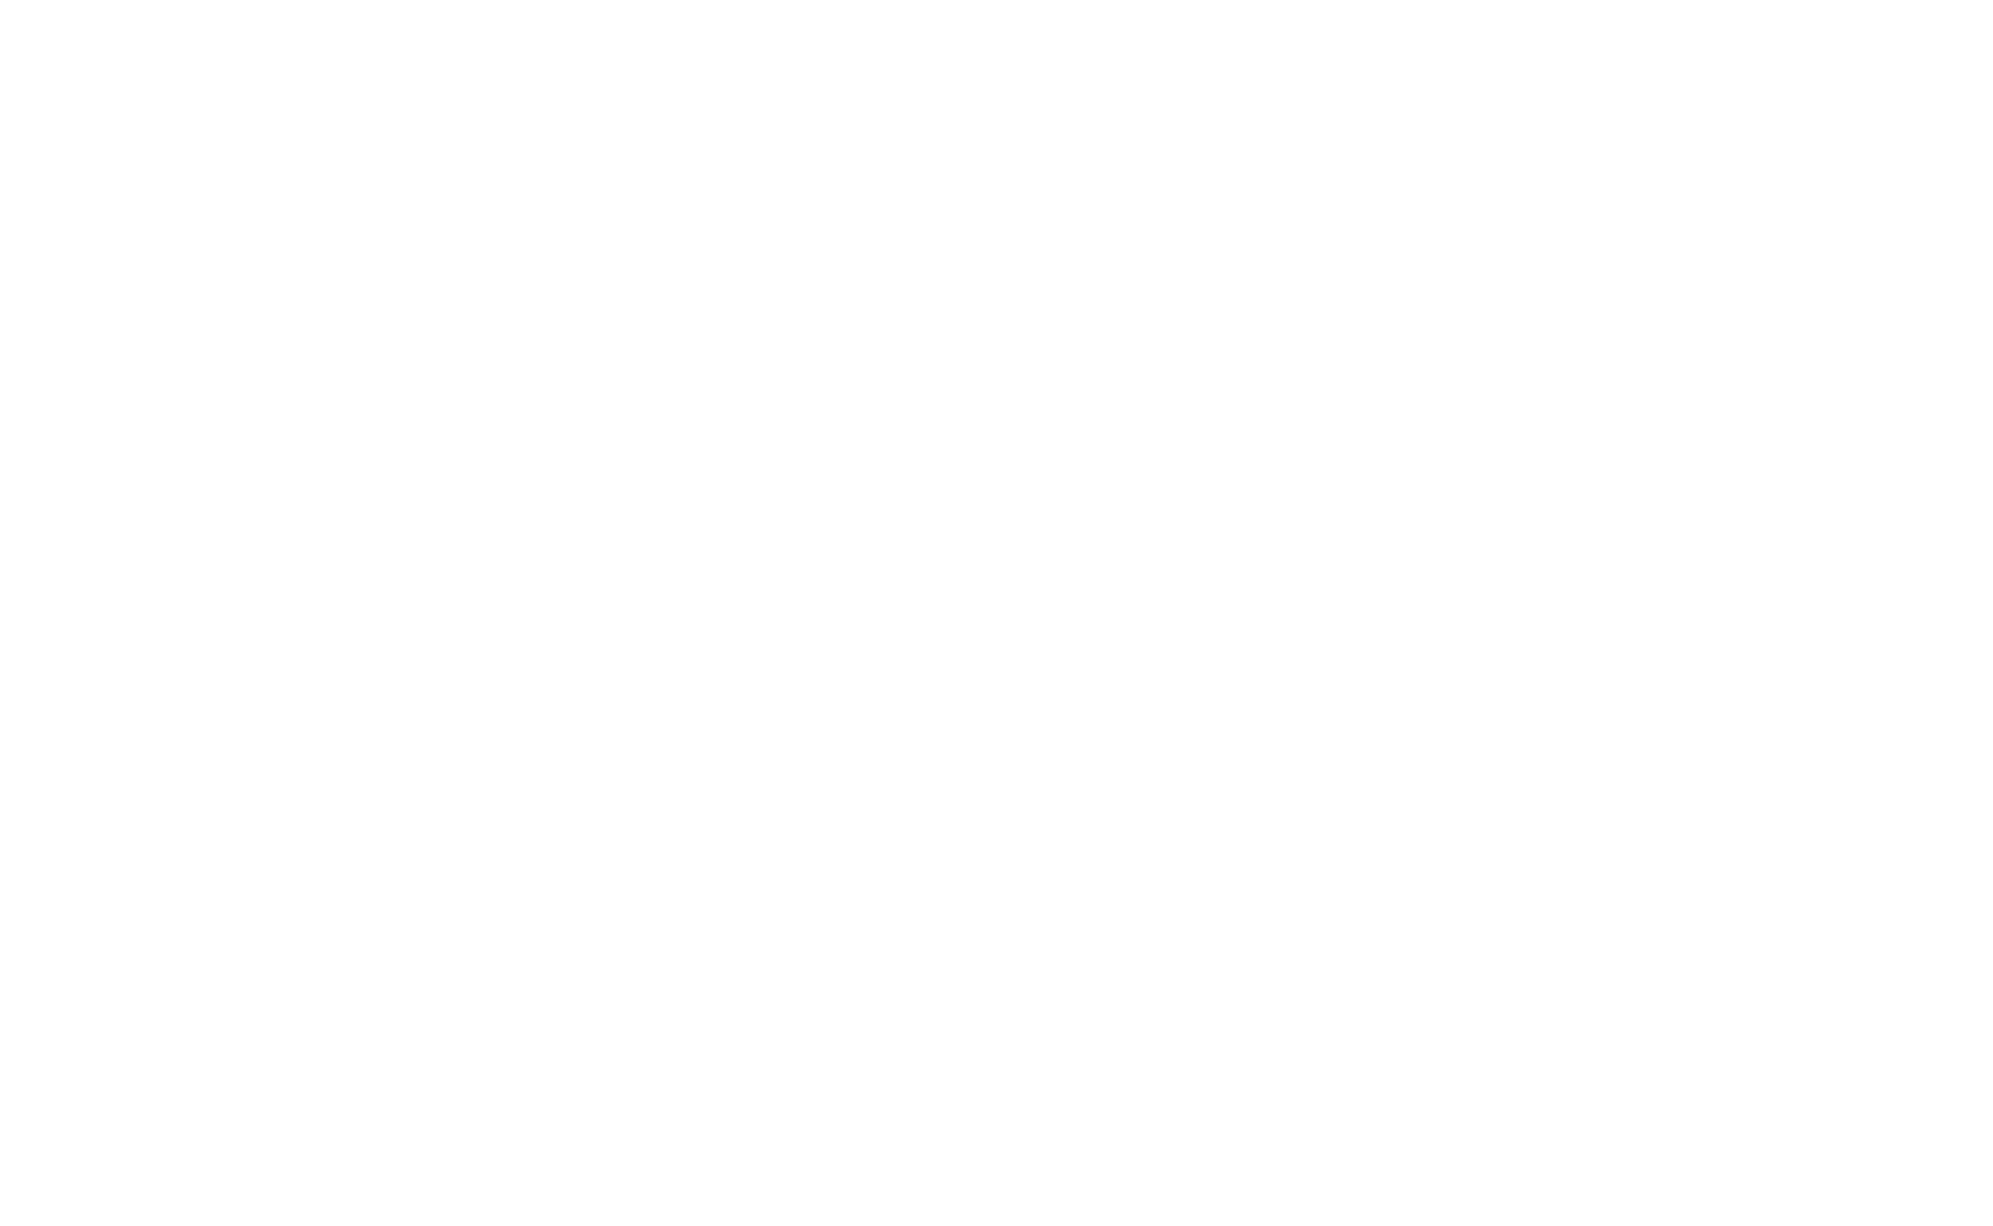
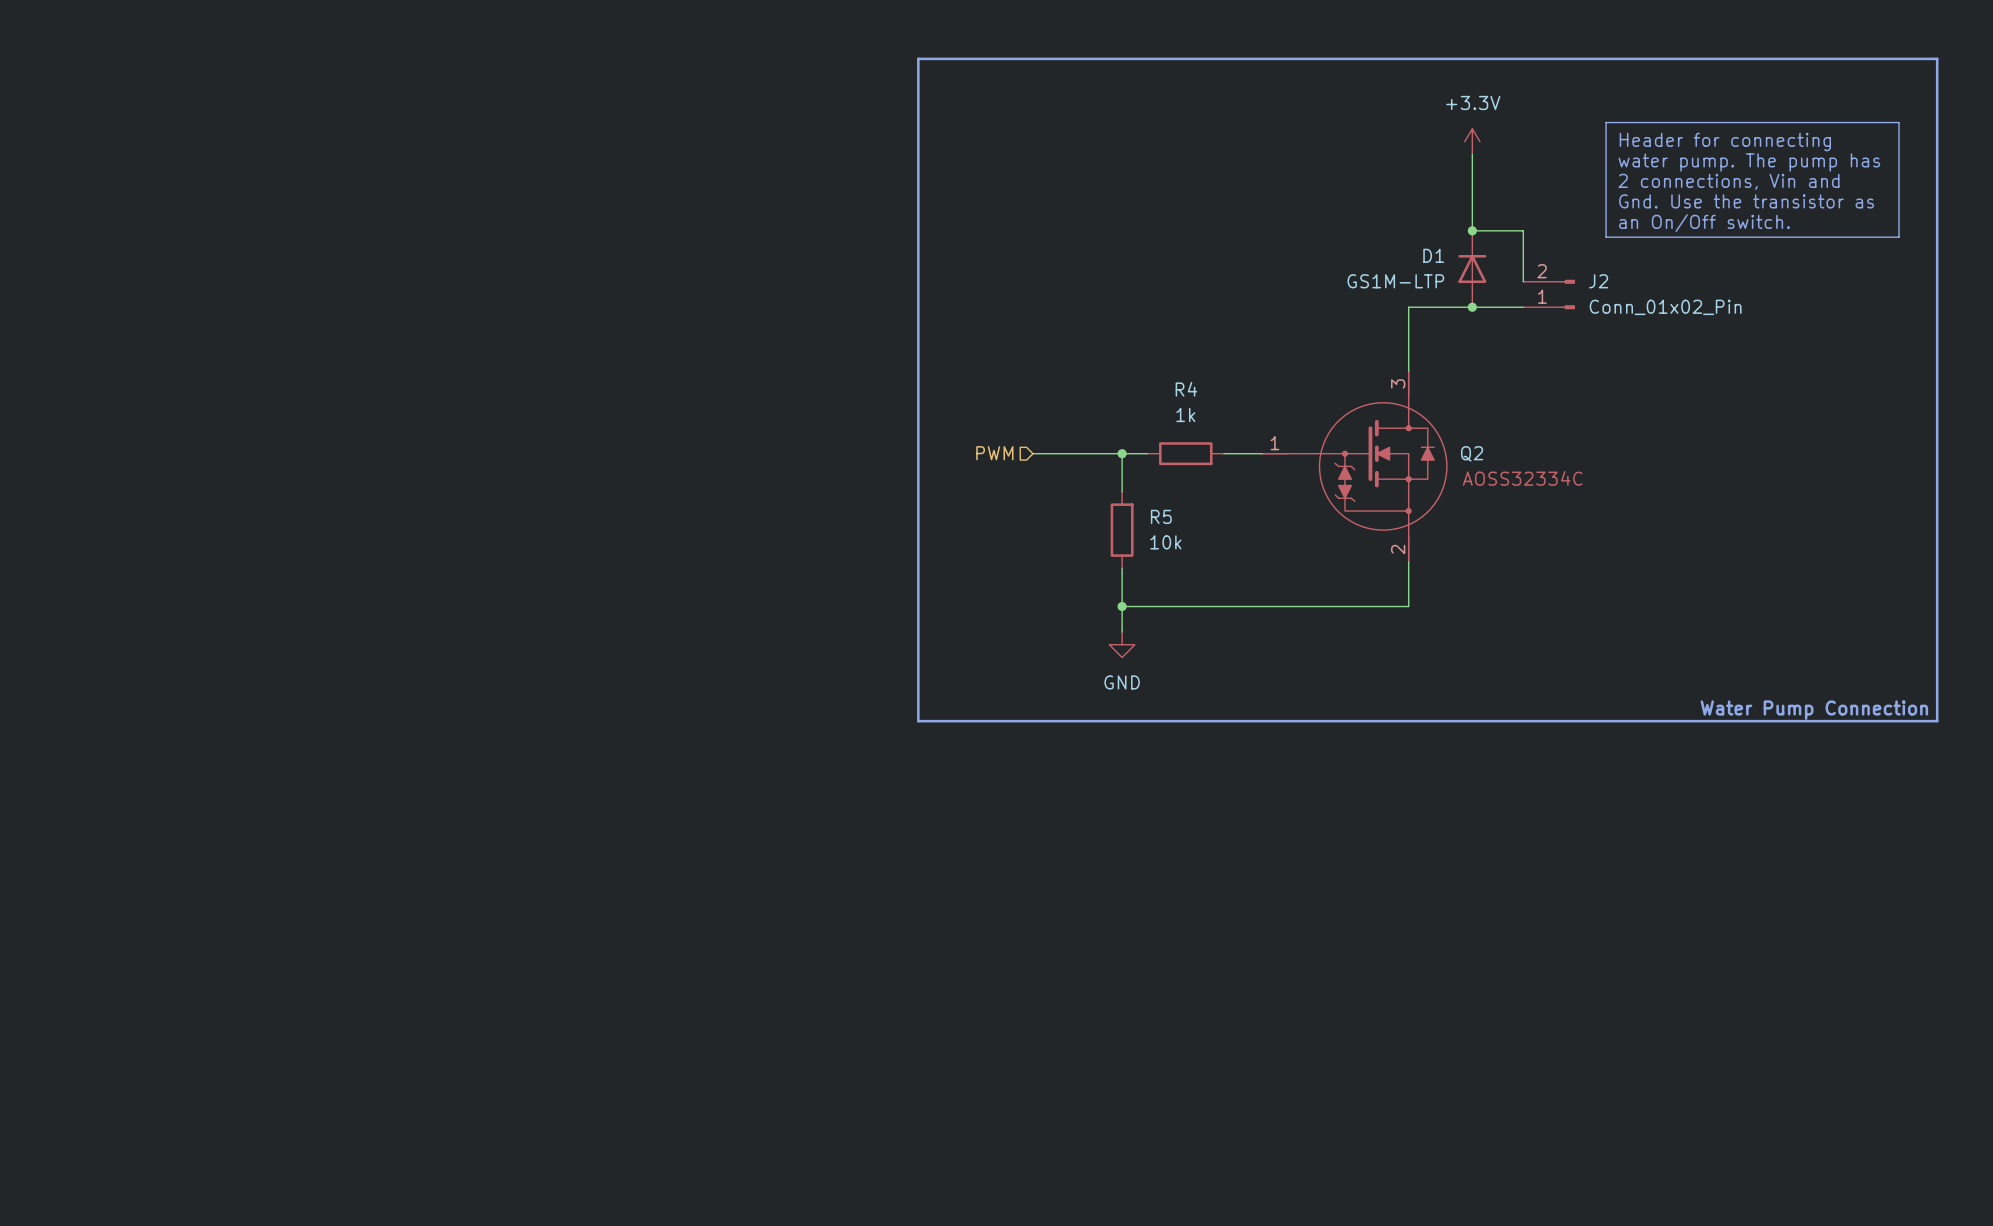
line: none -> (918, 58) (1937, 58) (1937, 721) (918, 721) (918, 58)
line: none -> (1606, 122) (1898, 122) (1898, 237) (1606, 237) (1606, 122)
power symbol: none -> +3.3V (1472, 141)
text: none -> Header for connecting (1725, 141)
wire: none -> (1472, 154) (1472, 230) (1523, 230) (1523, 281)
text: none -> water pump. The pump has (1749, 162)
text: none -> 2 connections, Vin and (1728, 181)
text: none -> Gnd. Use the transistor as (1746, 201)
text: none -> an On/Off switch. (1704, 223)
junction: none -> (1472, 230)
D1: none -> GS1M-LTP (1472, 269)
J2: none -> Conn_01x02_Pin (1549, 294)
junction: none -> (1472, 307)
wire: none -> (1523, 307) (1408, 307) (1408, 370)
hierarchical label: none -> PWM (994, 453)
wire: none -> (1032, 453) (1147, 453)
wire: none -> (1122, 453) (1122, 491)
junction: none -> (1122, 453)
R4: none -> 1k (1185, 453)
wire: none -> (1224, 453) (1262, 453)
Q2: none -> (1354, 466)
R5: none -> 10k (1122, 530)
wire: none -> (1408, 561) (1408, 606) (1122, 606)
wire: none -> (1122, 568) (1122, 631)
junction: none -> (1122, 606)
power symbol: none -> GND (1122, 644)
text: none -> Water Pump Connection (1814, 710)

